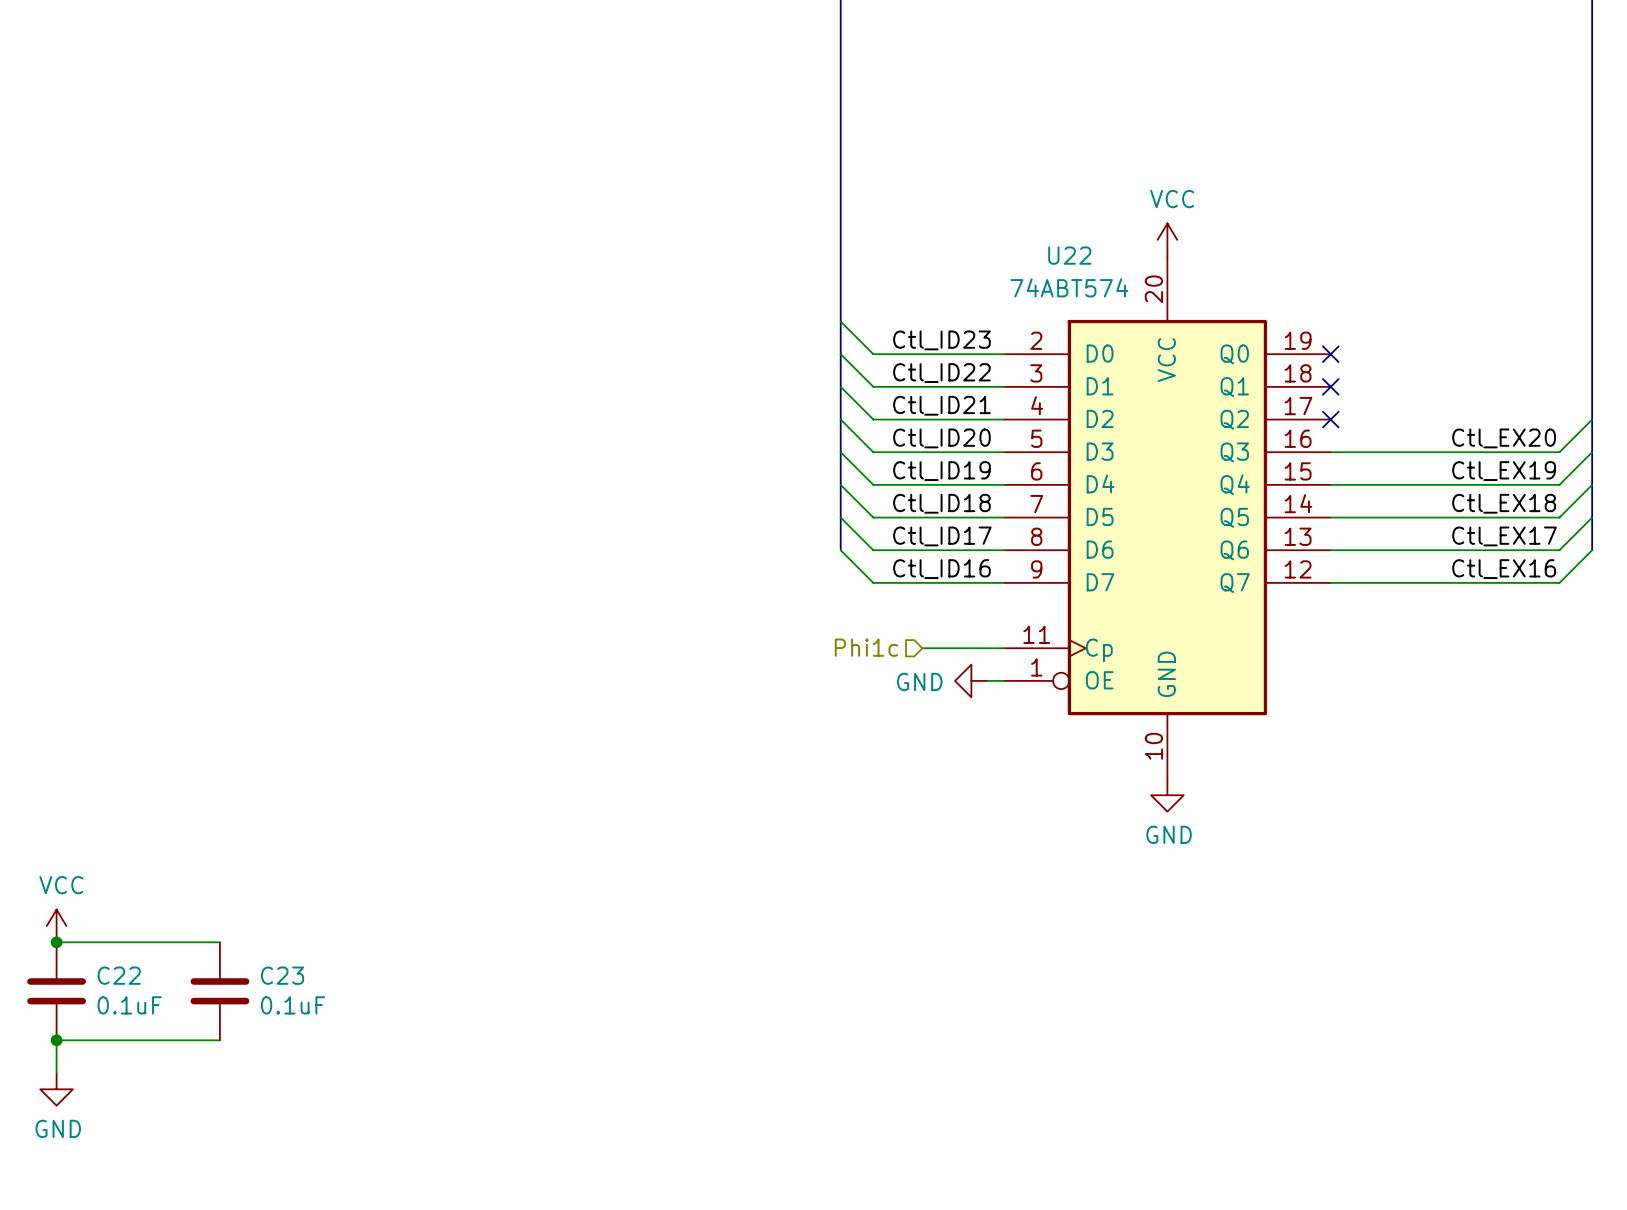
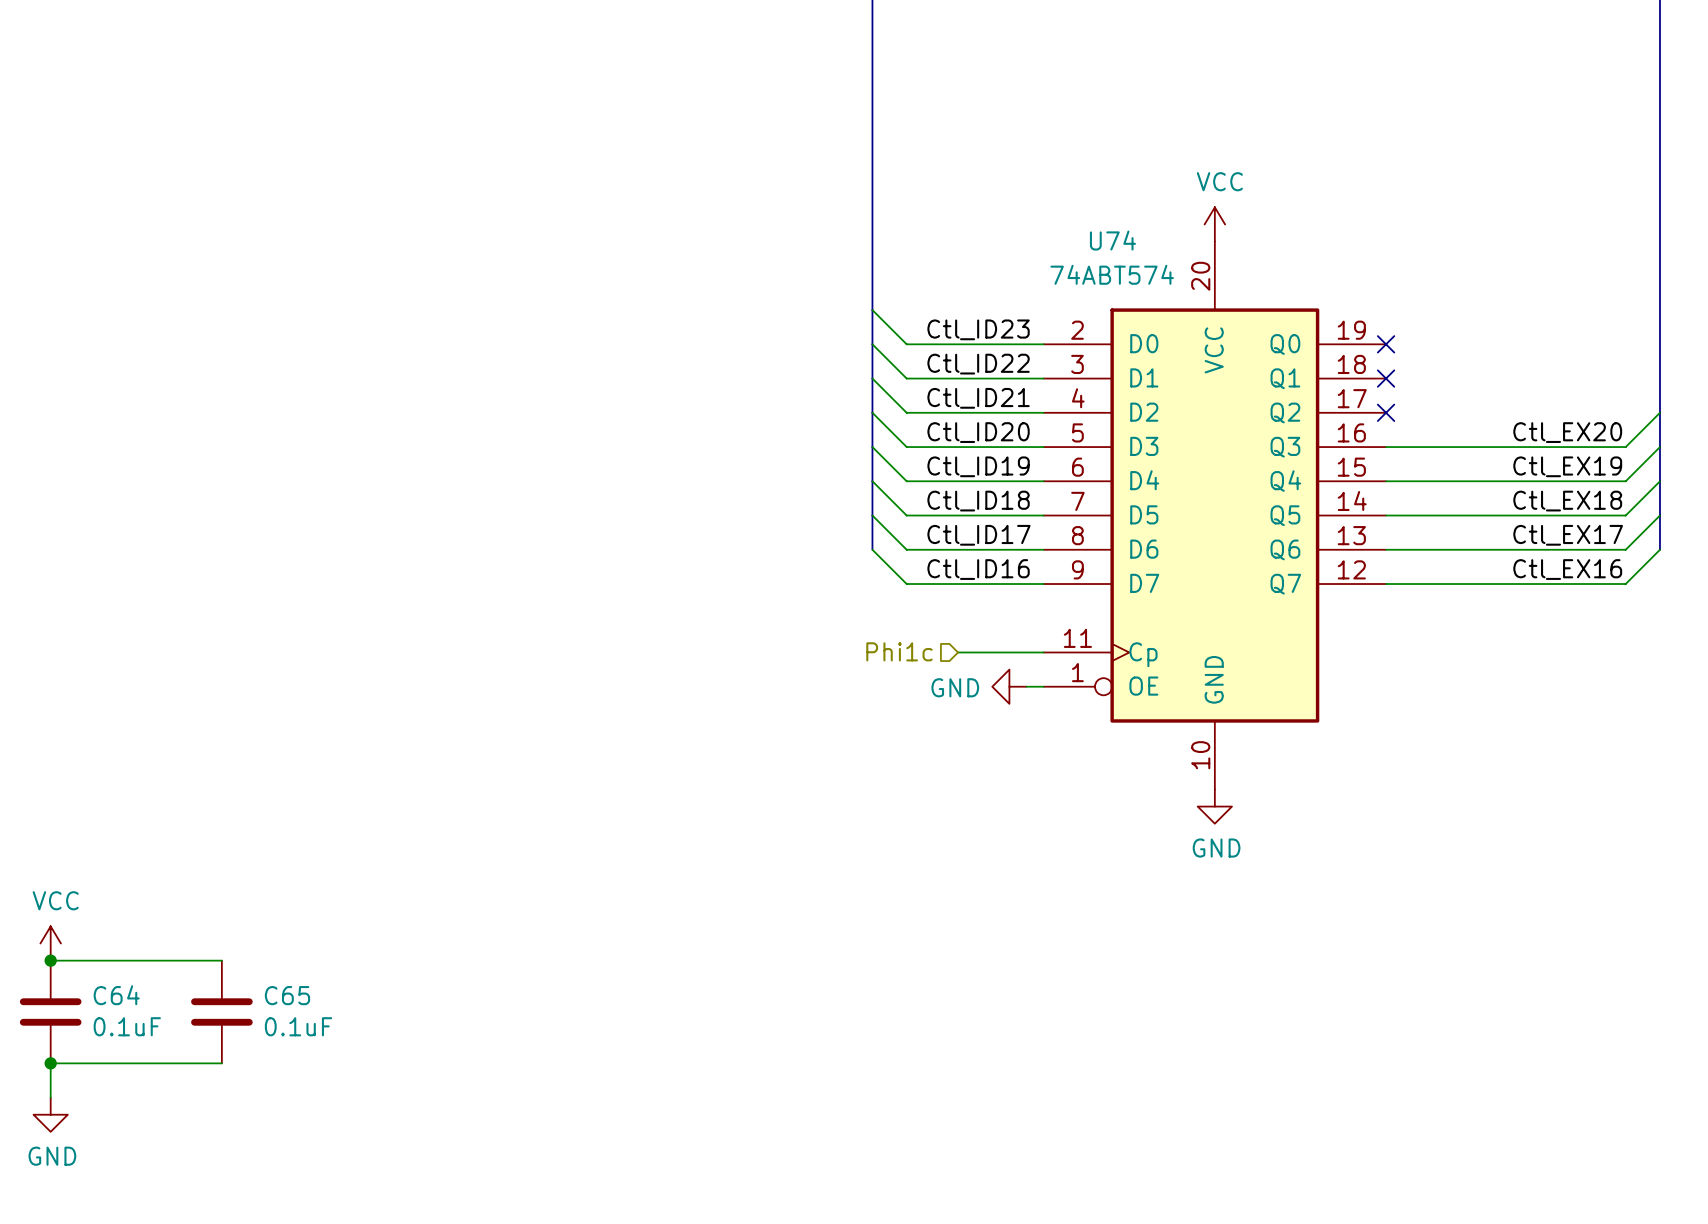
U22 name: U22 (1069, 255) -> U74 (1112, 240)
C22 name: C22 (119, 975) -> C64 (116, 995)
C23 name: C23 (282, 975) -> C65 (287, 995)

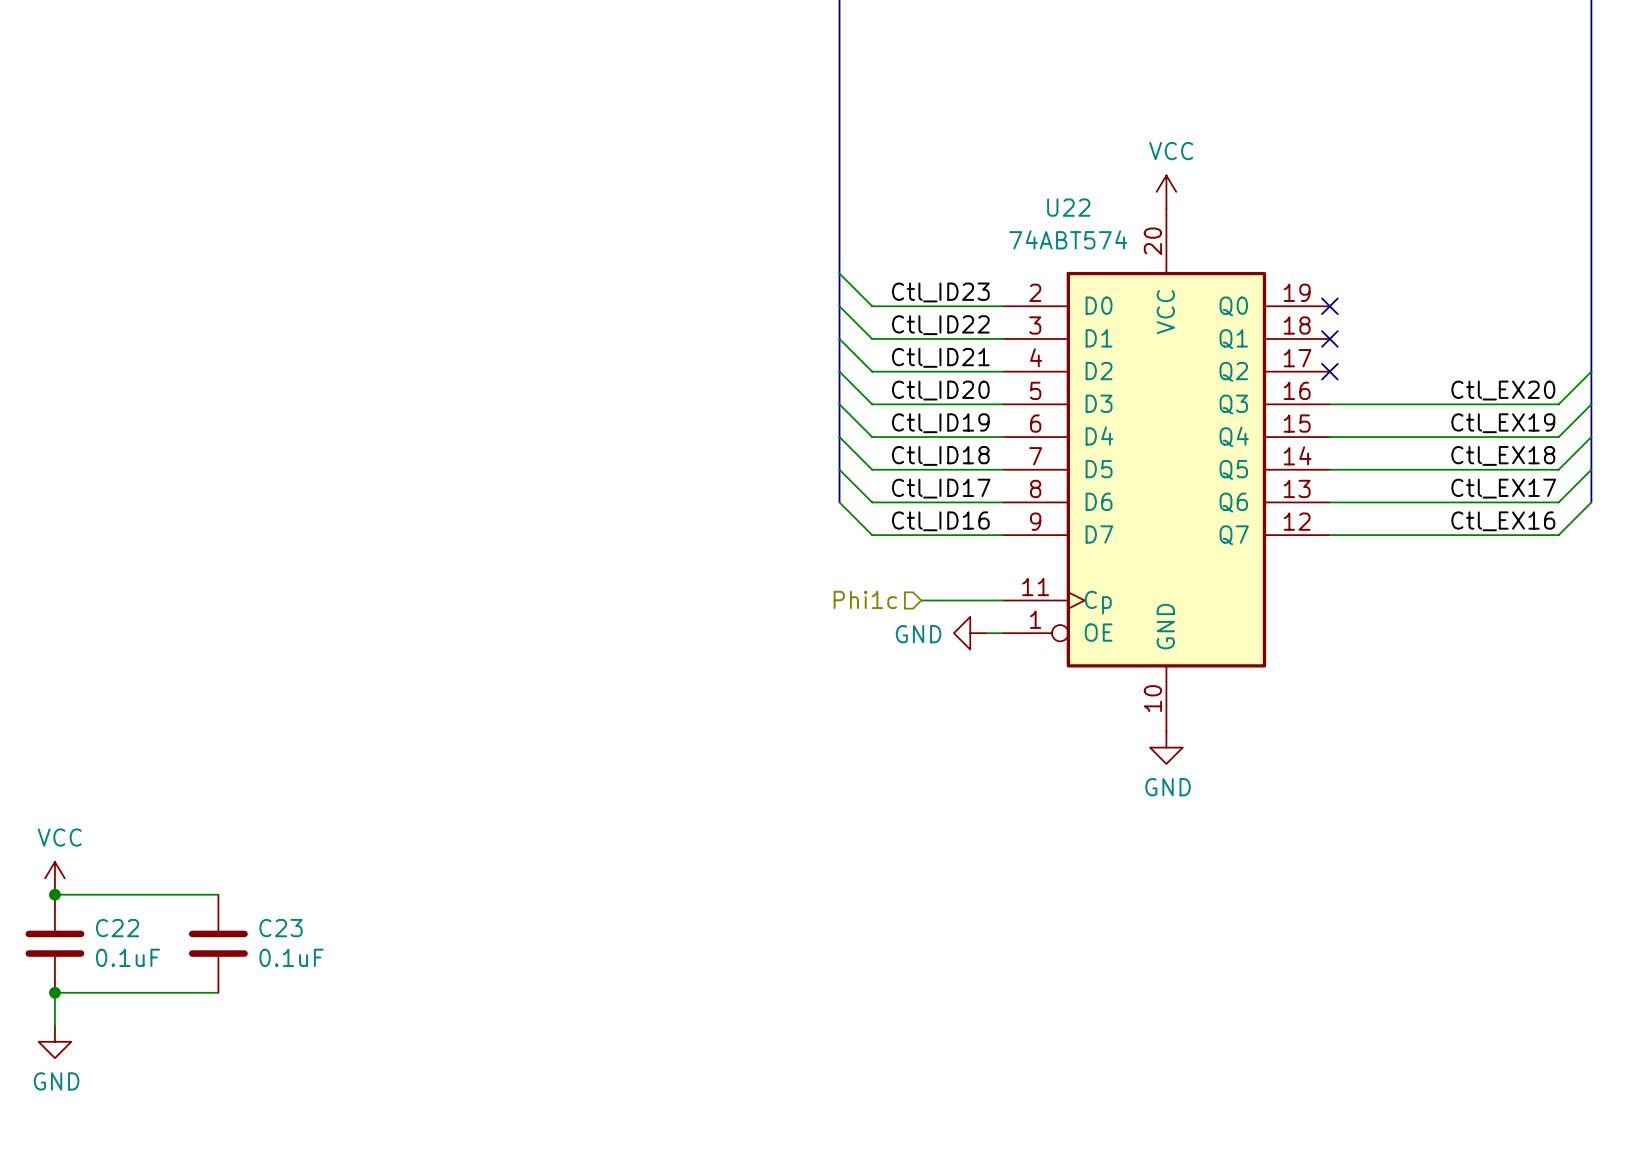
U74 name: U74 (1112, 240) -> U22 (1068, 207)
C64 name: C64 (116, 995) -> C22 (117, 928)
C65 name: C65 (287, 995) -> C23 (281, 928)

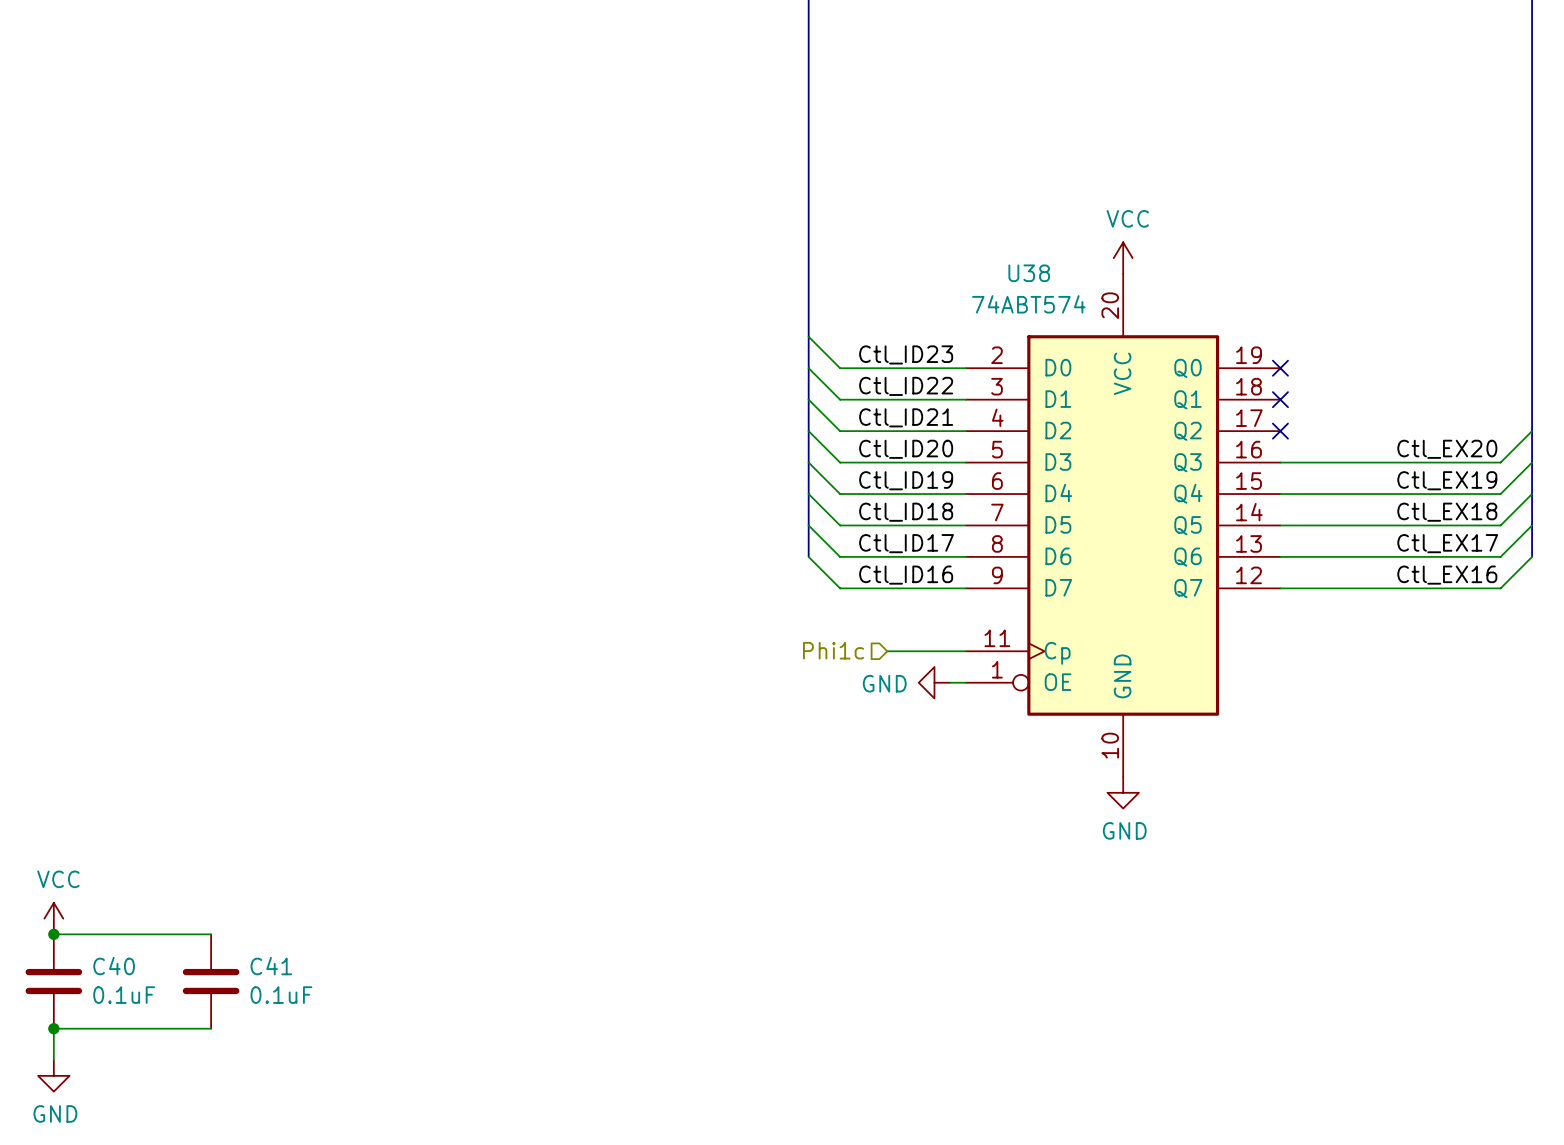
U22 name: U22 (1068, 207) -> U38 (1029, 273)
C22 name: C22 (117, 928) -> C40 (114, 966)
C23 name: C23 (281, 928) -> C41 (271, 966)

